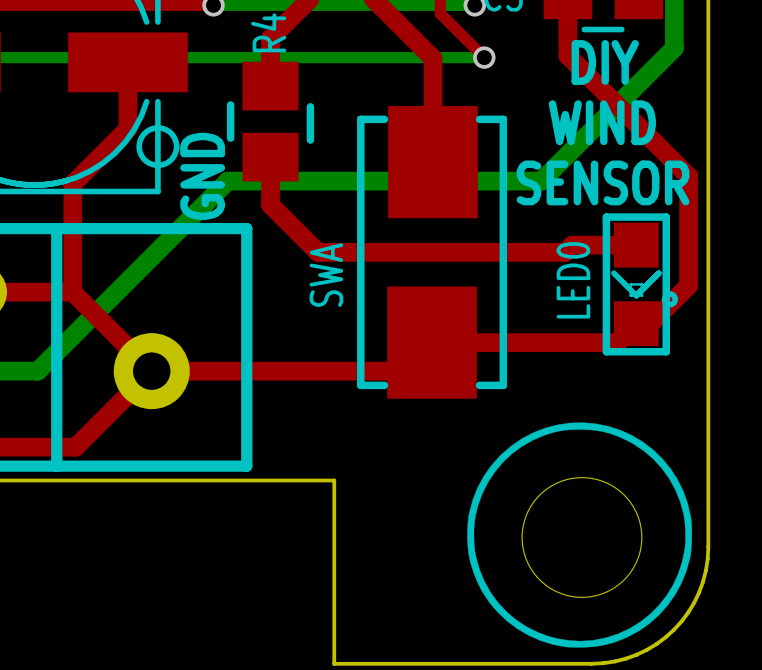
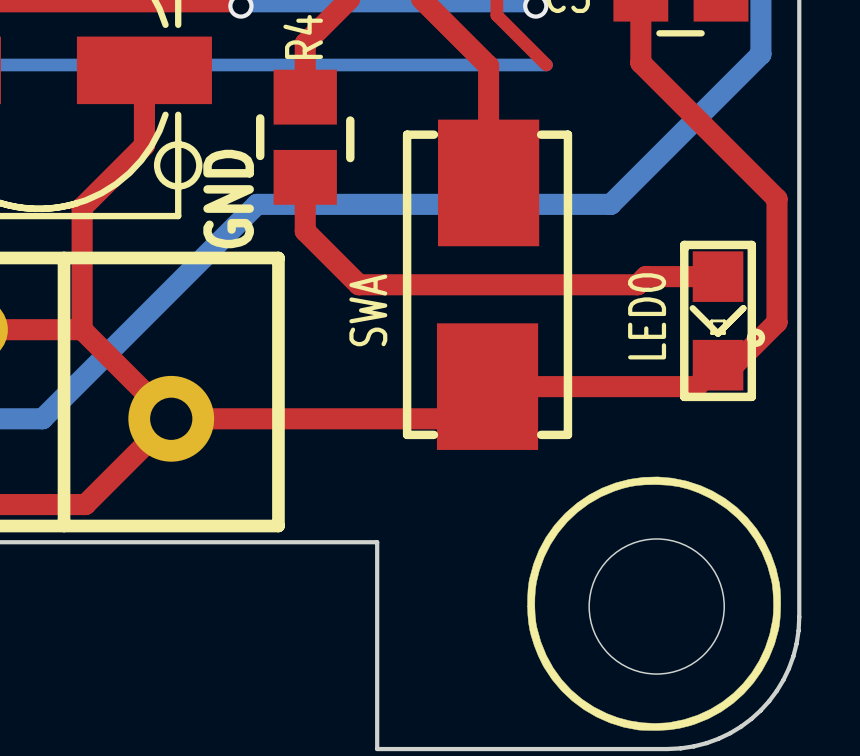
via: (484, 57) -> none
text: DIY (605, 62) -> none
text: WIND (602, 122) -> none
text: SENSOR (603, 182) -> none

